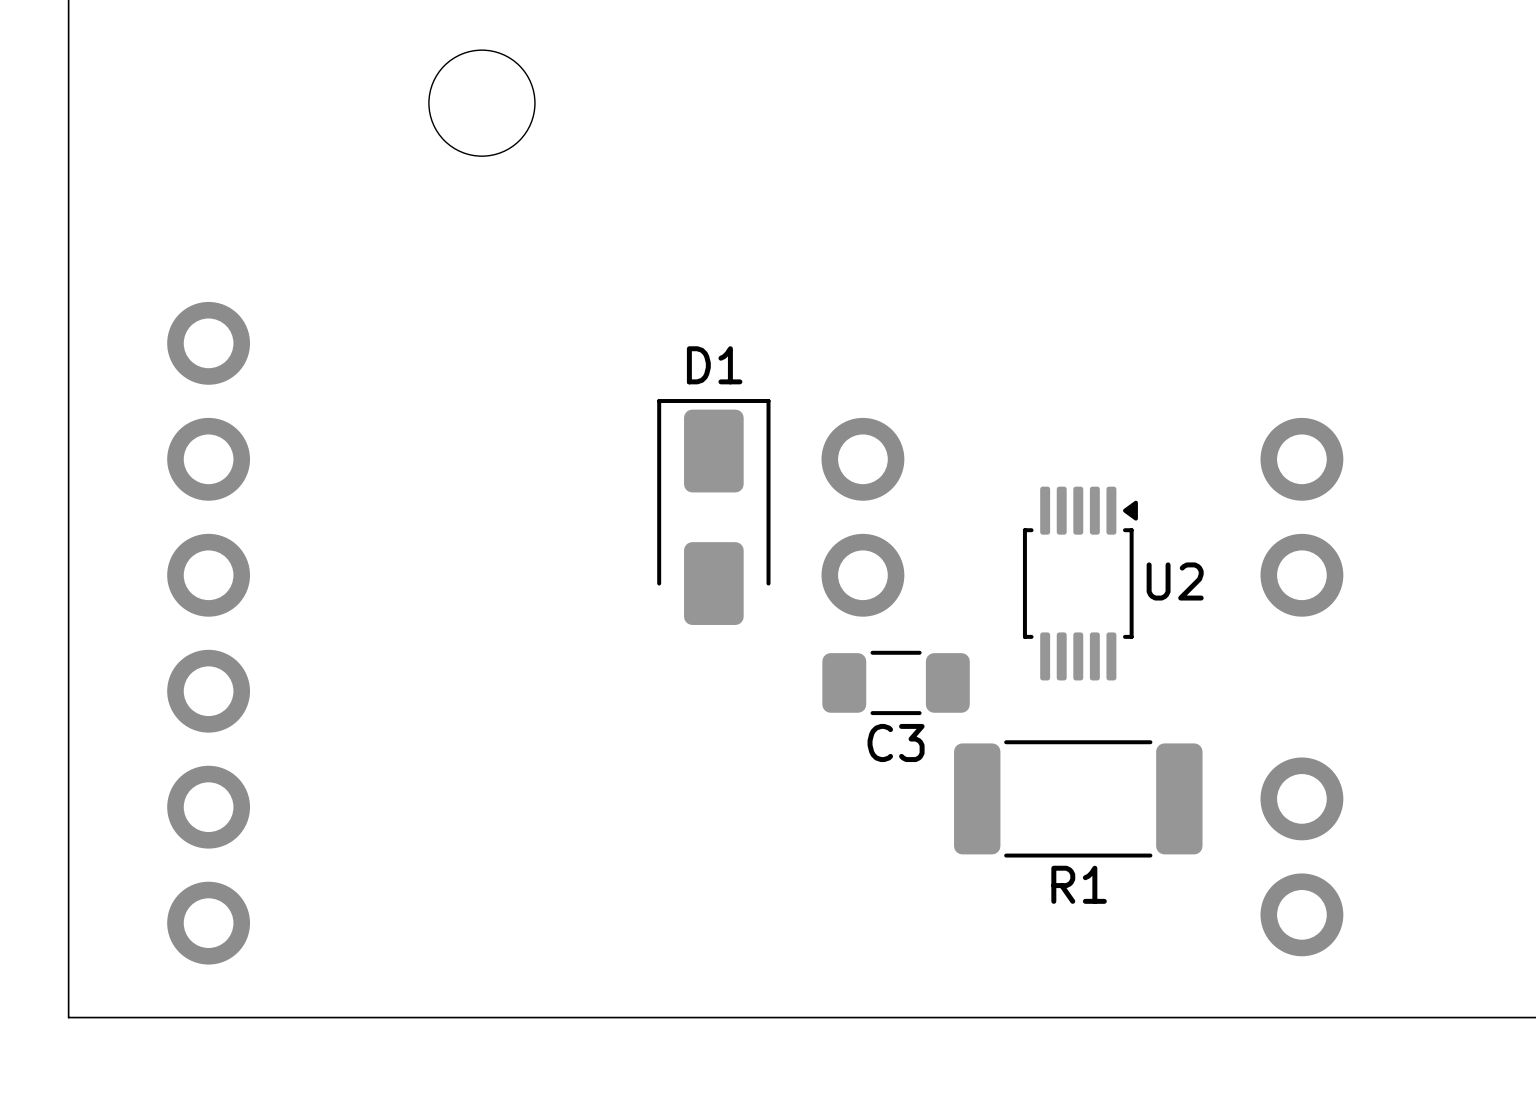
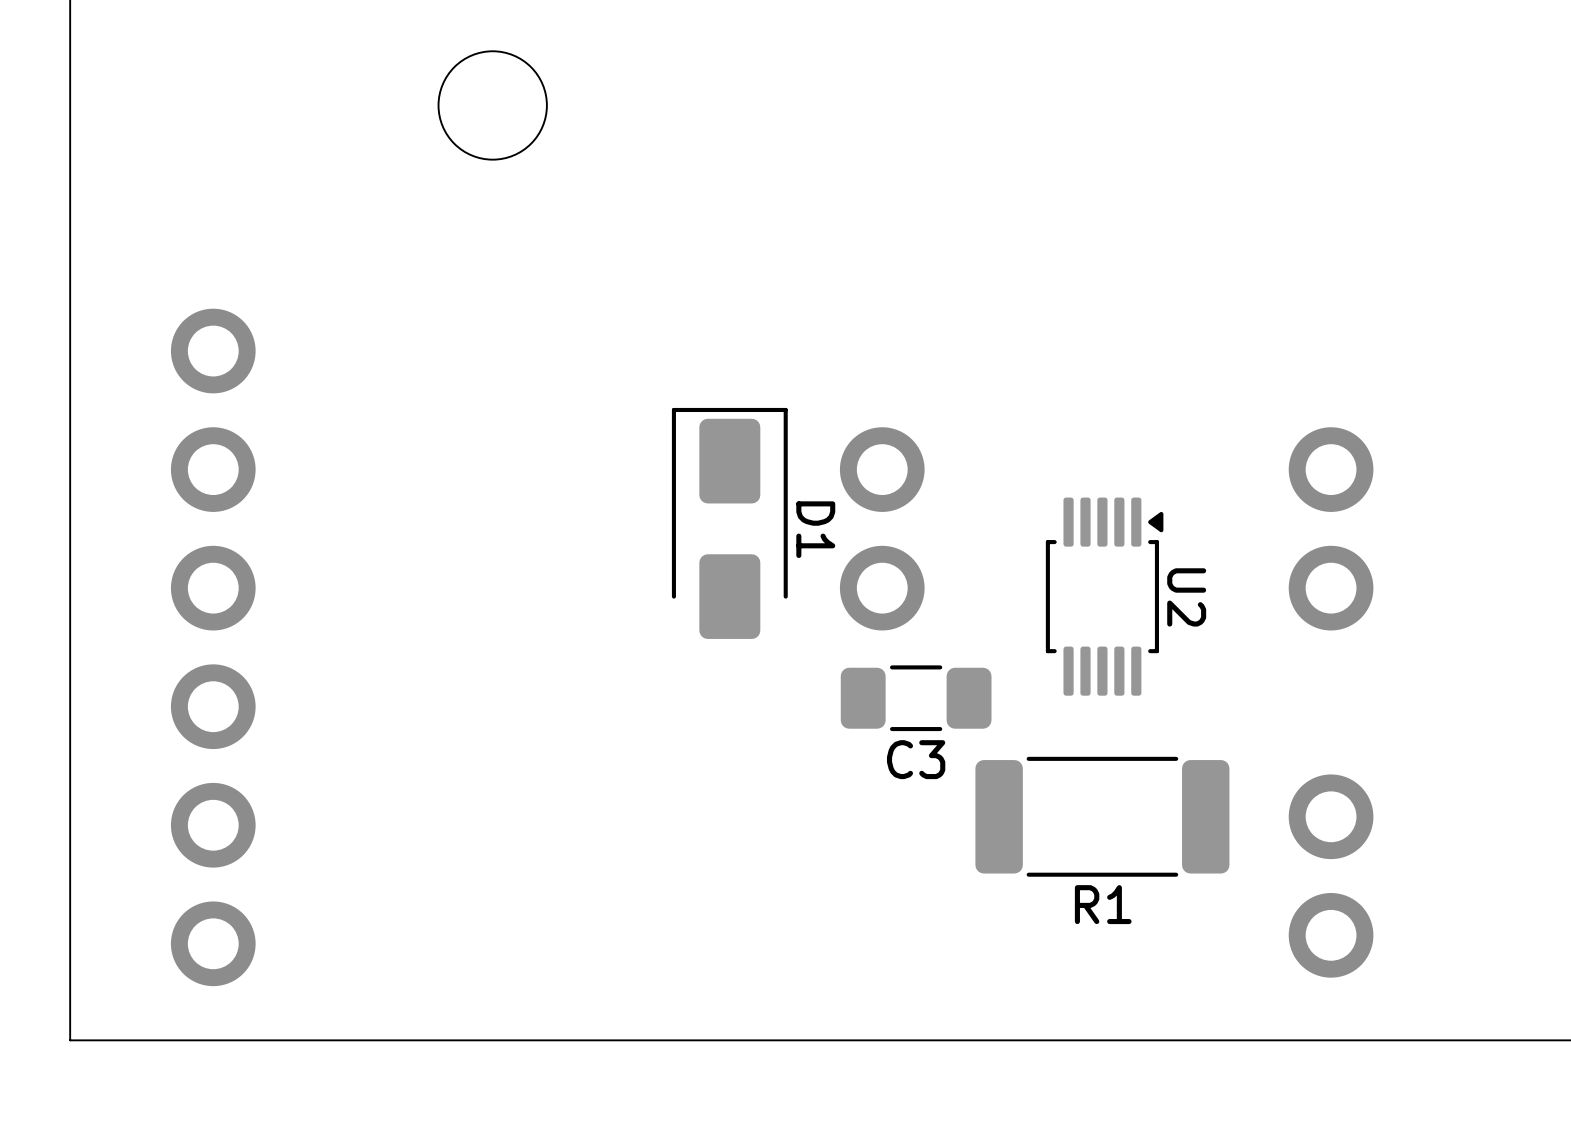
D1 name rotation: 0° (714, 365) -> 90° clockwise (815, 529)
D1 name position: D1 (714, 365) -> D1 (815, 529)
U2 name rotation: 0° (1175, 581) -> 90° clockwise (1186, 597)

